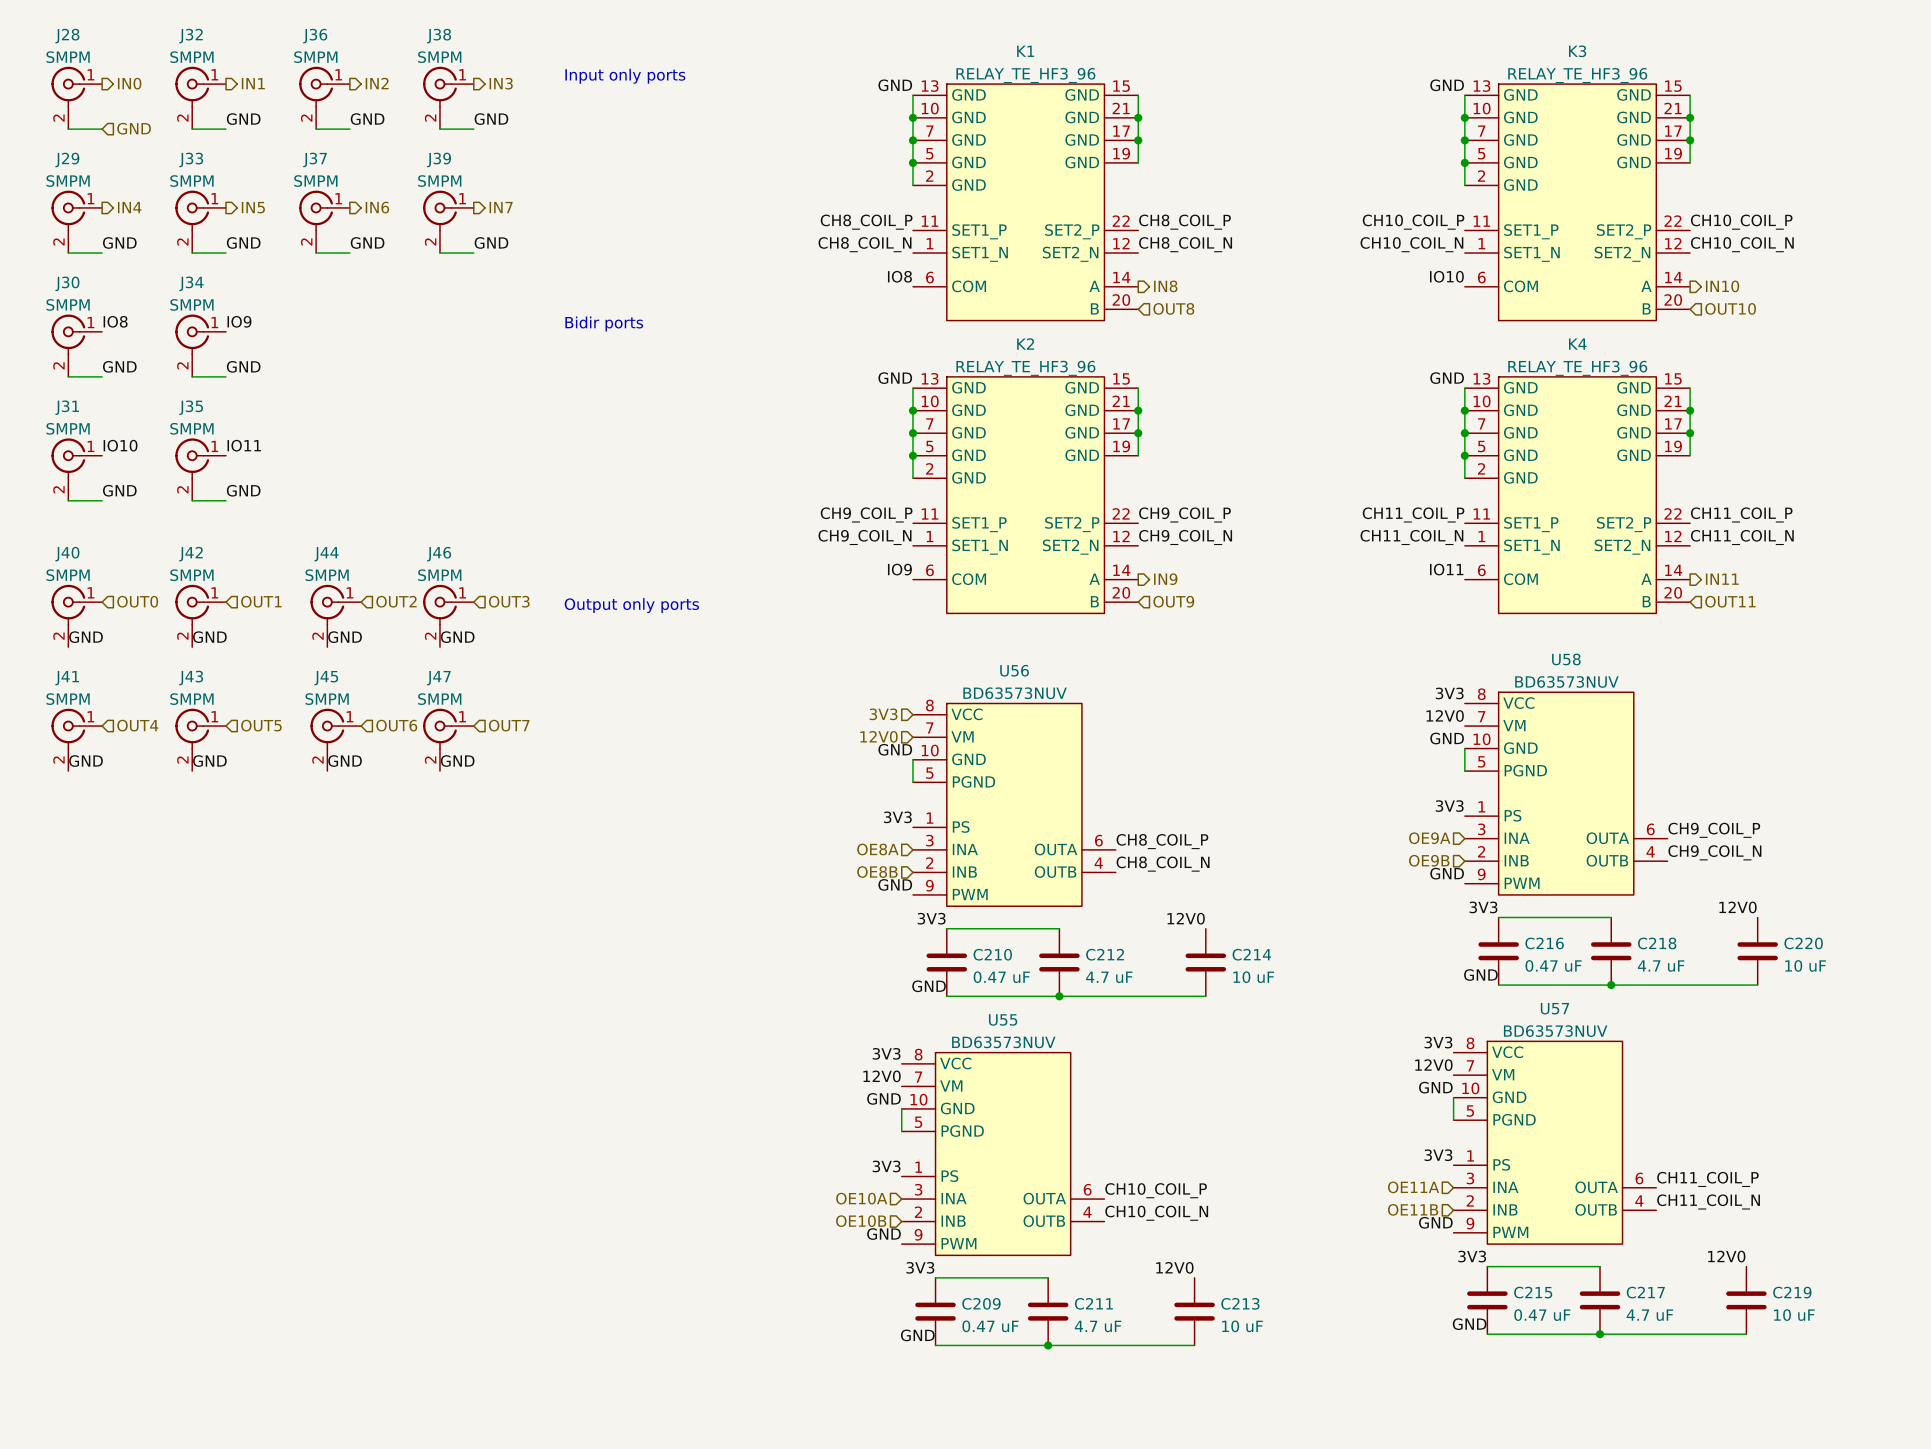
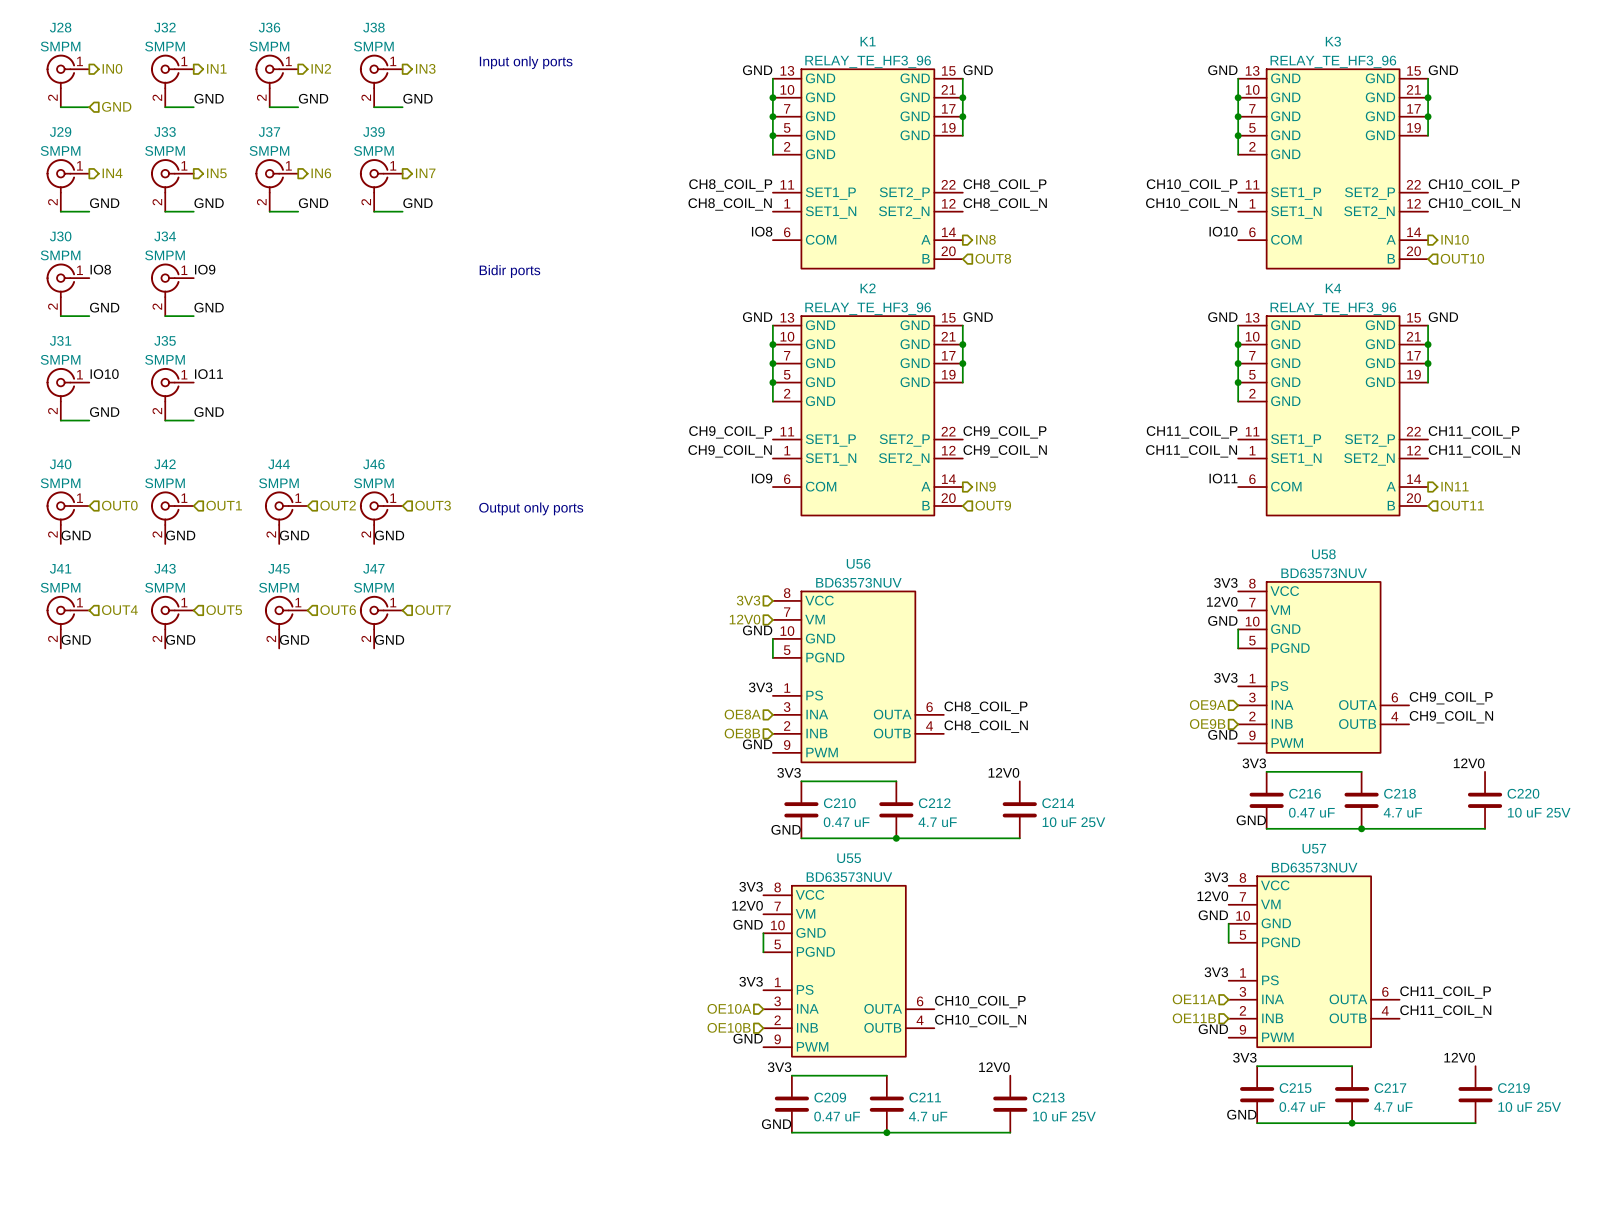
label: none -> GND (978, 70)
label: none -> GND (1443, 70)
label: none -> GND (978, 317)
label: none -> GND (1443, 317)
C220 value: 10 uF (1805, 965) -> 10 uF 25V (1539, 812)
C214 value: 10 uF (1253, 977) -> 10 uF 25V (1073, 822)
C219 value: 10 uF (1794, 1315) -> 10 uF 25V (1529, 1107)
C213 value: 10 uF (1242, 1326) -> 10 uF 25V (1064, 1116)

